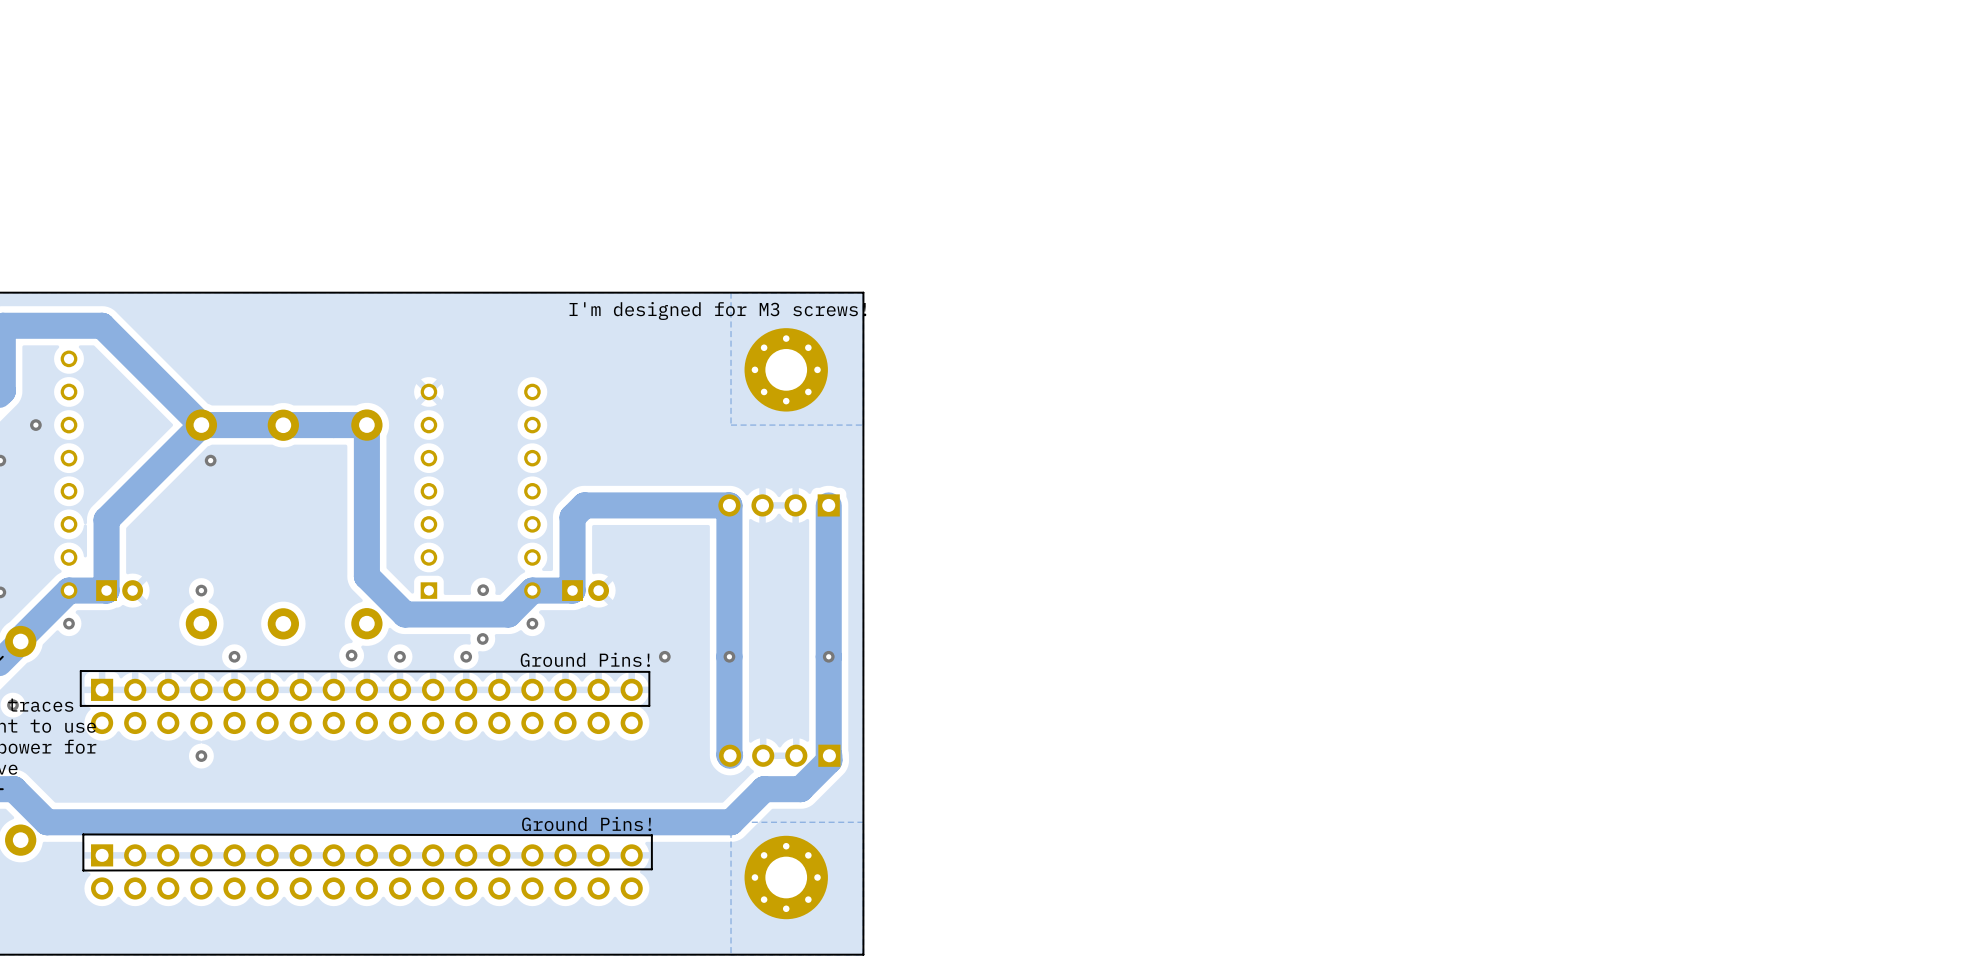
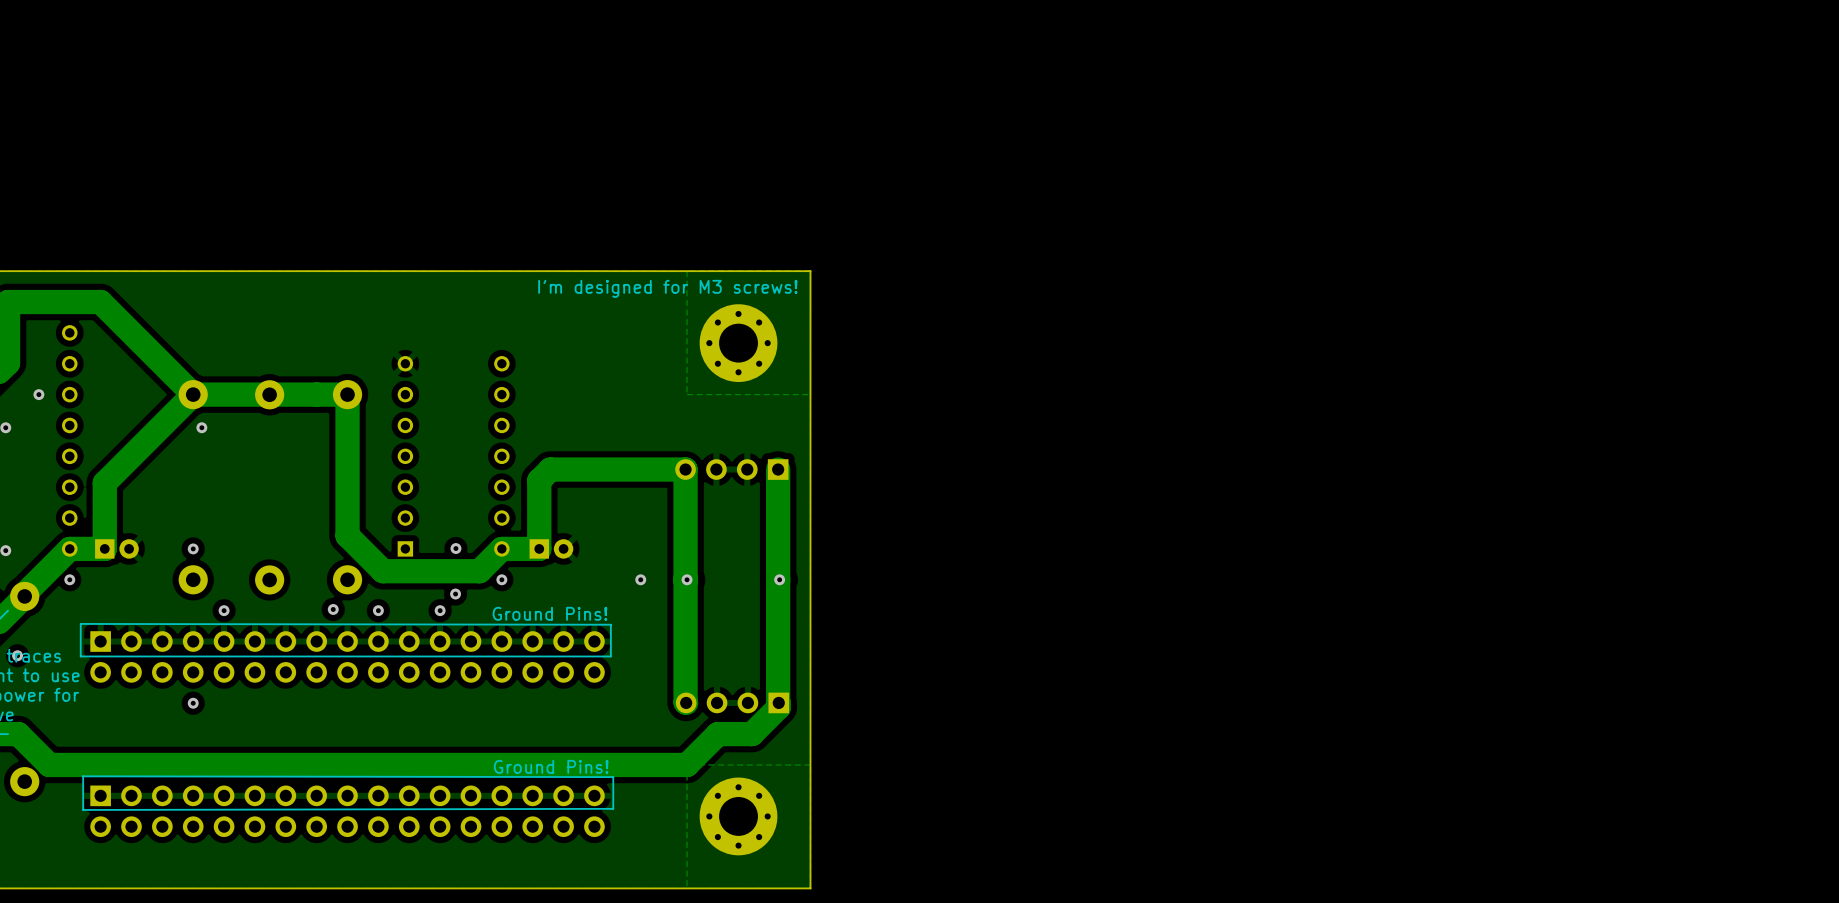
via: none -> (640, 579)
via: none -> (687, 579)
via: (664, 656) -> none
via: (729, 656) -> none
via position: (828, 656) -> (779, 579)

